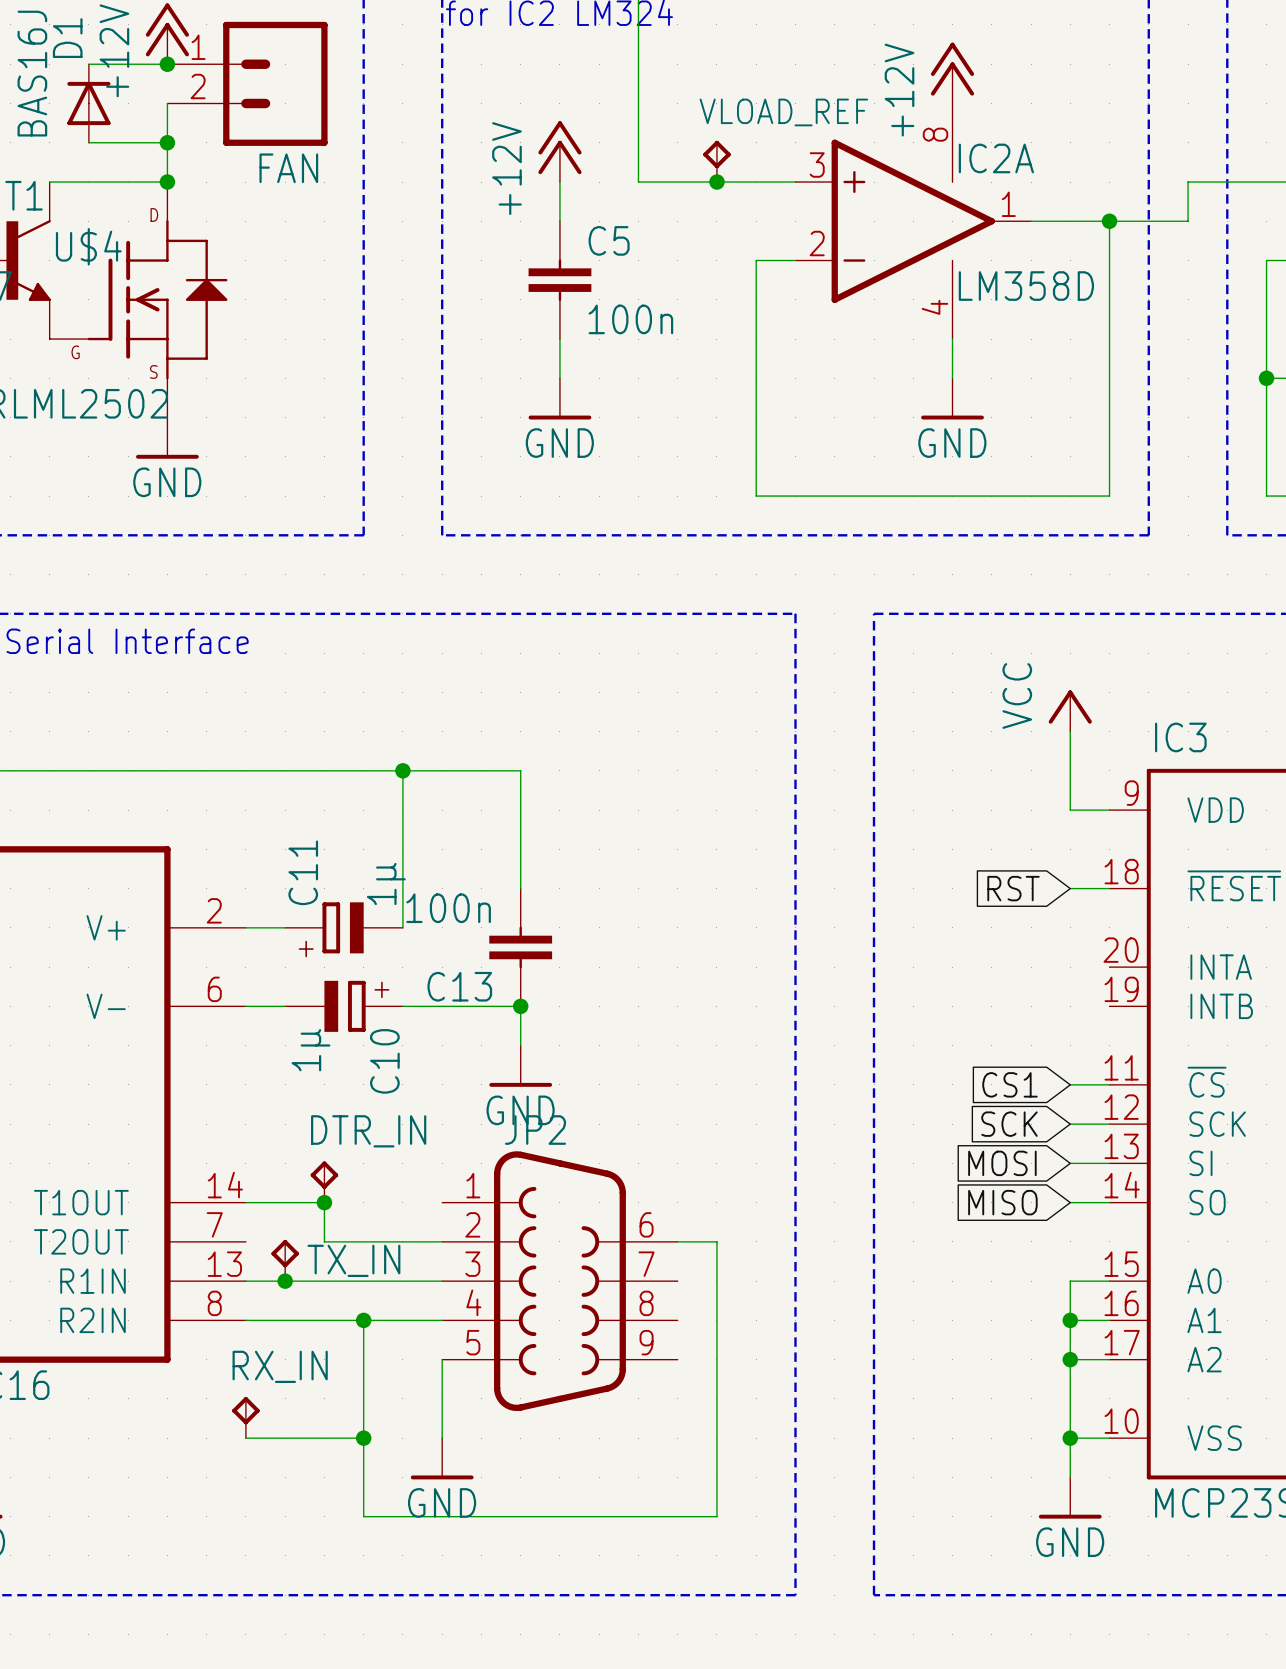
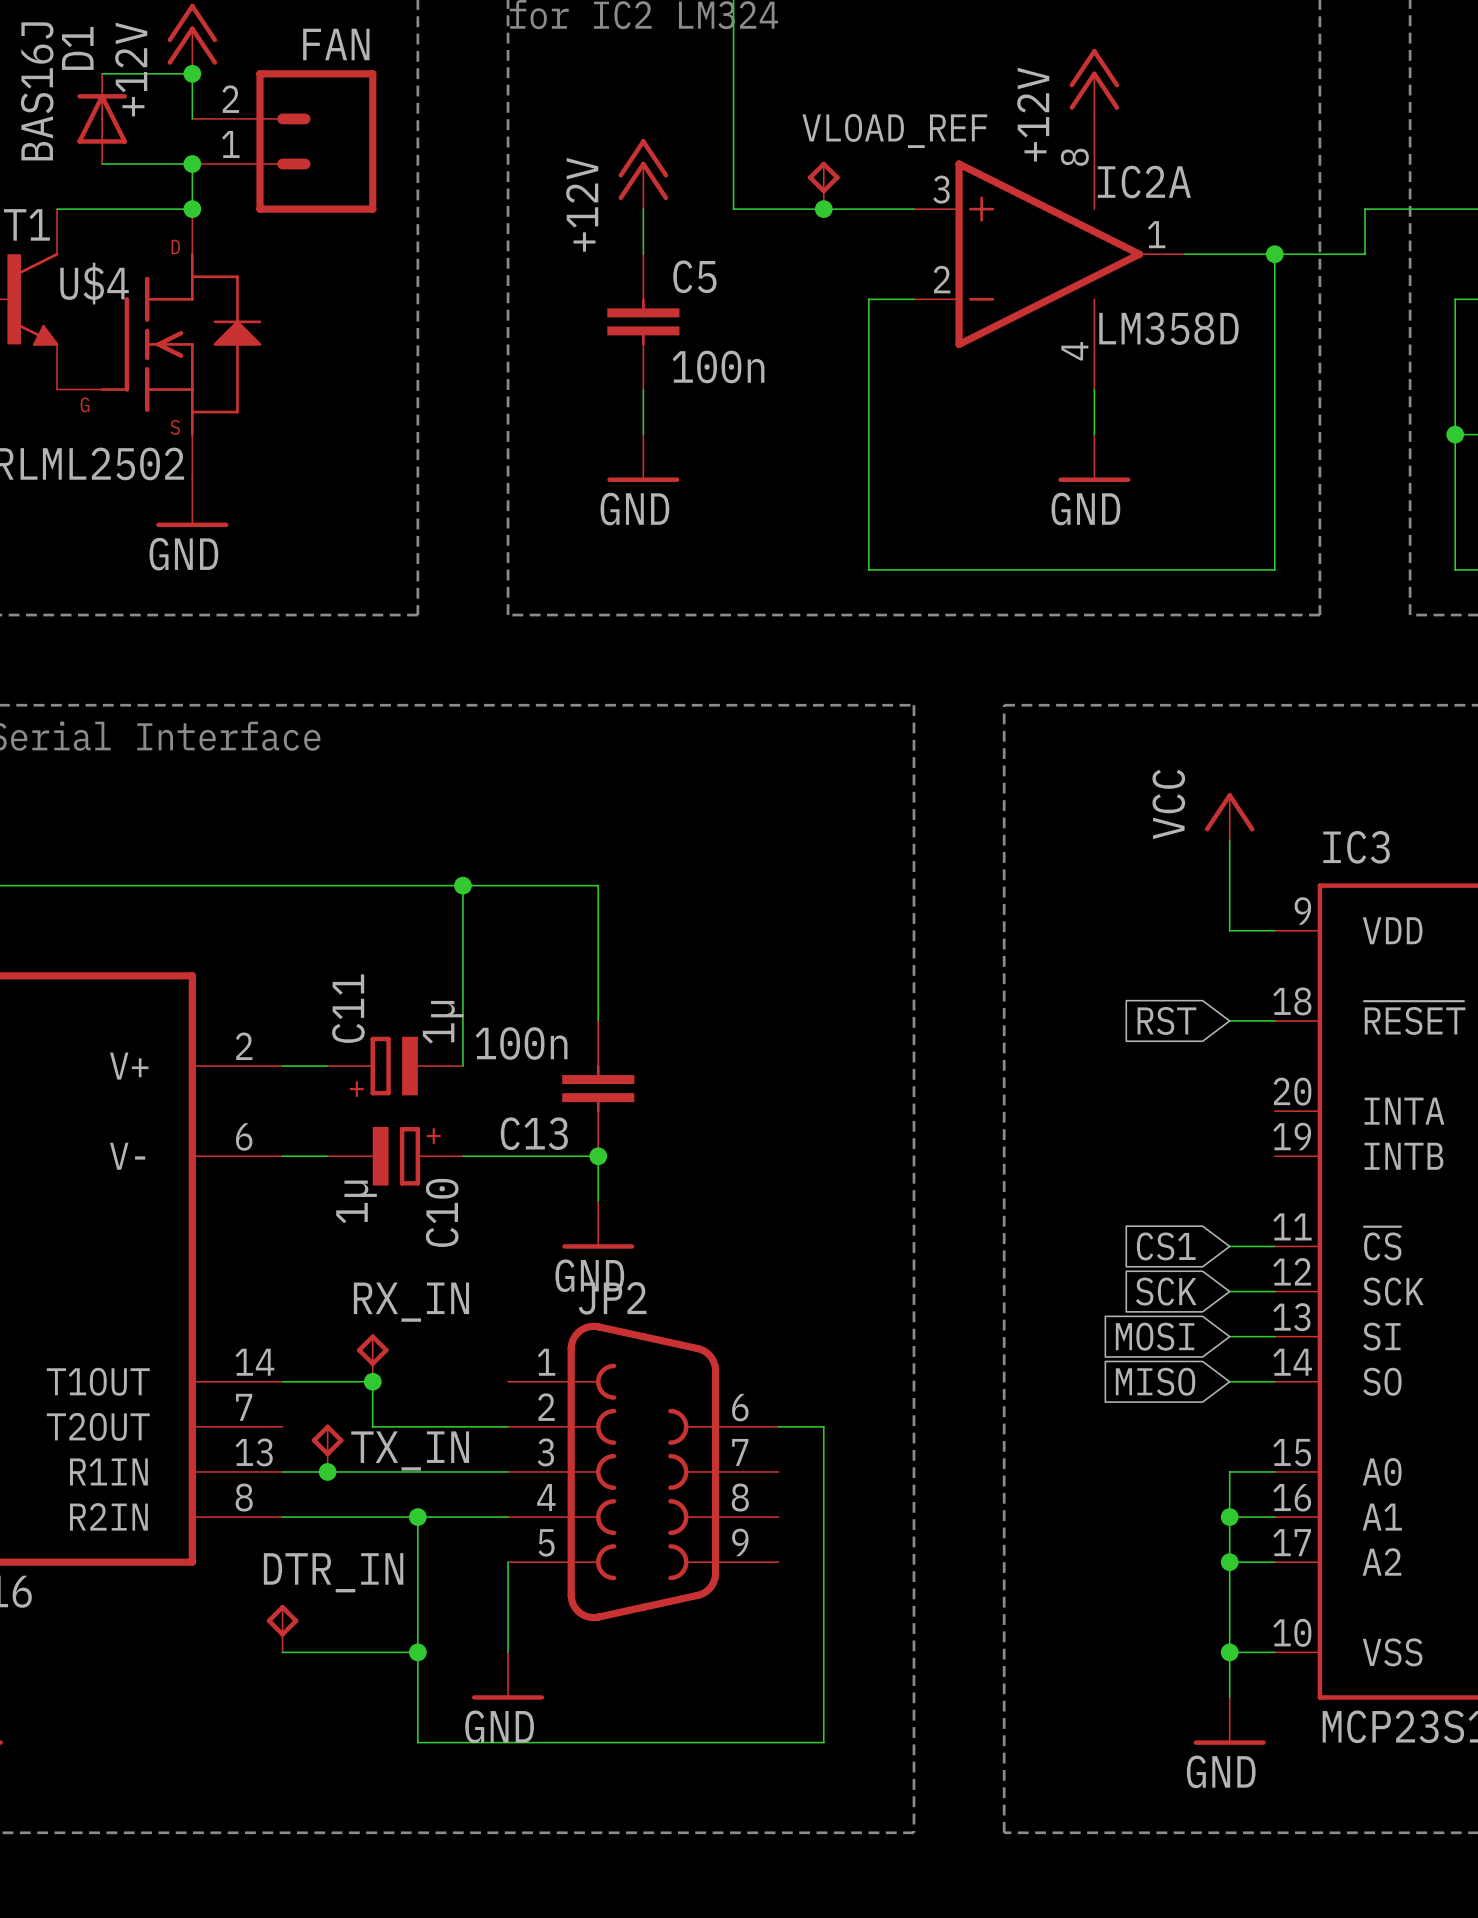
FAN: (247, 83) -> none
wire: (167, 103) (167, 142) -> (192, 118) (192, 73)
FAN: none -> (284, 141)
DTR_IN name: DTR_IN (368, 1131) -> RX_IN (411, 1302)
RX_IN name: RX_IN (280, 1366) -> DTR_IN (333, 1572)

